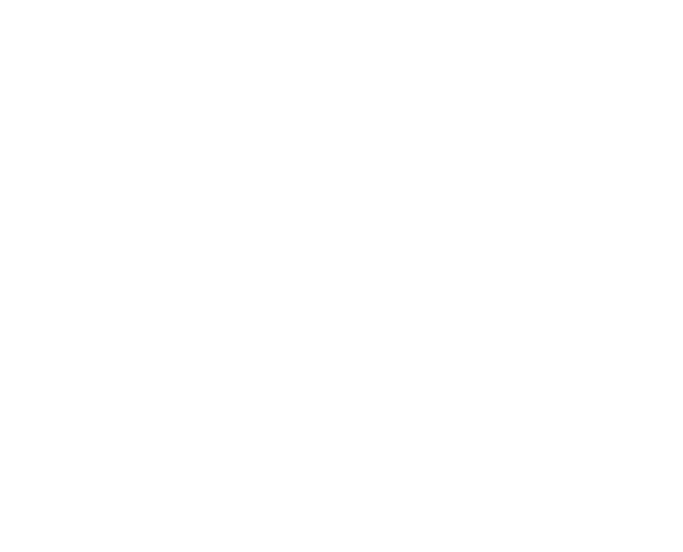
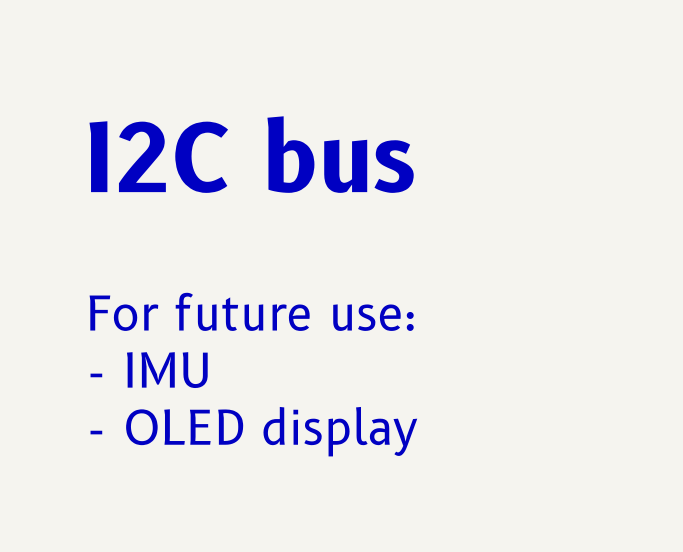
text: none -> I2C bus (251, 154)
text: none -> For future use: (251, 311)
text: none -> - IMU (149, 370)
text: none -> - OLED display (253, 431)

